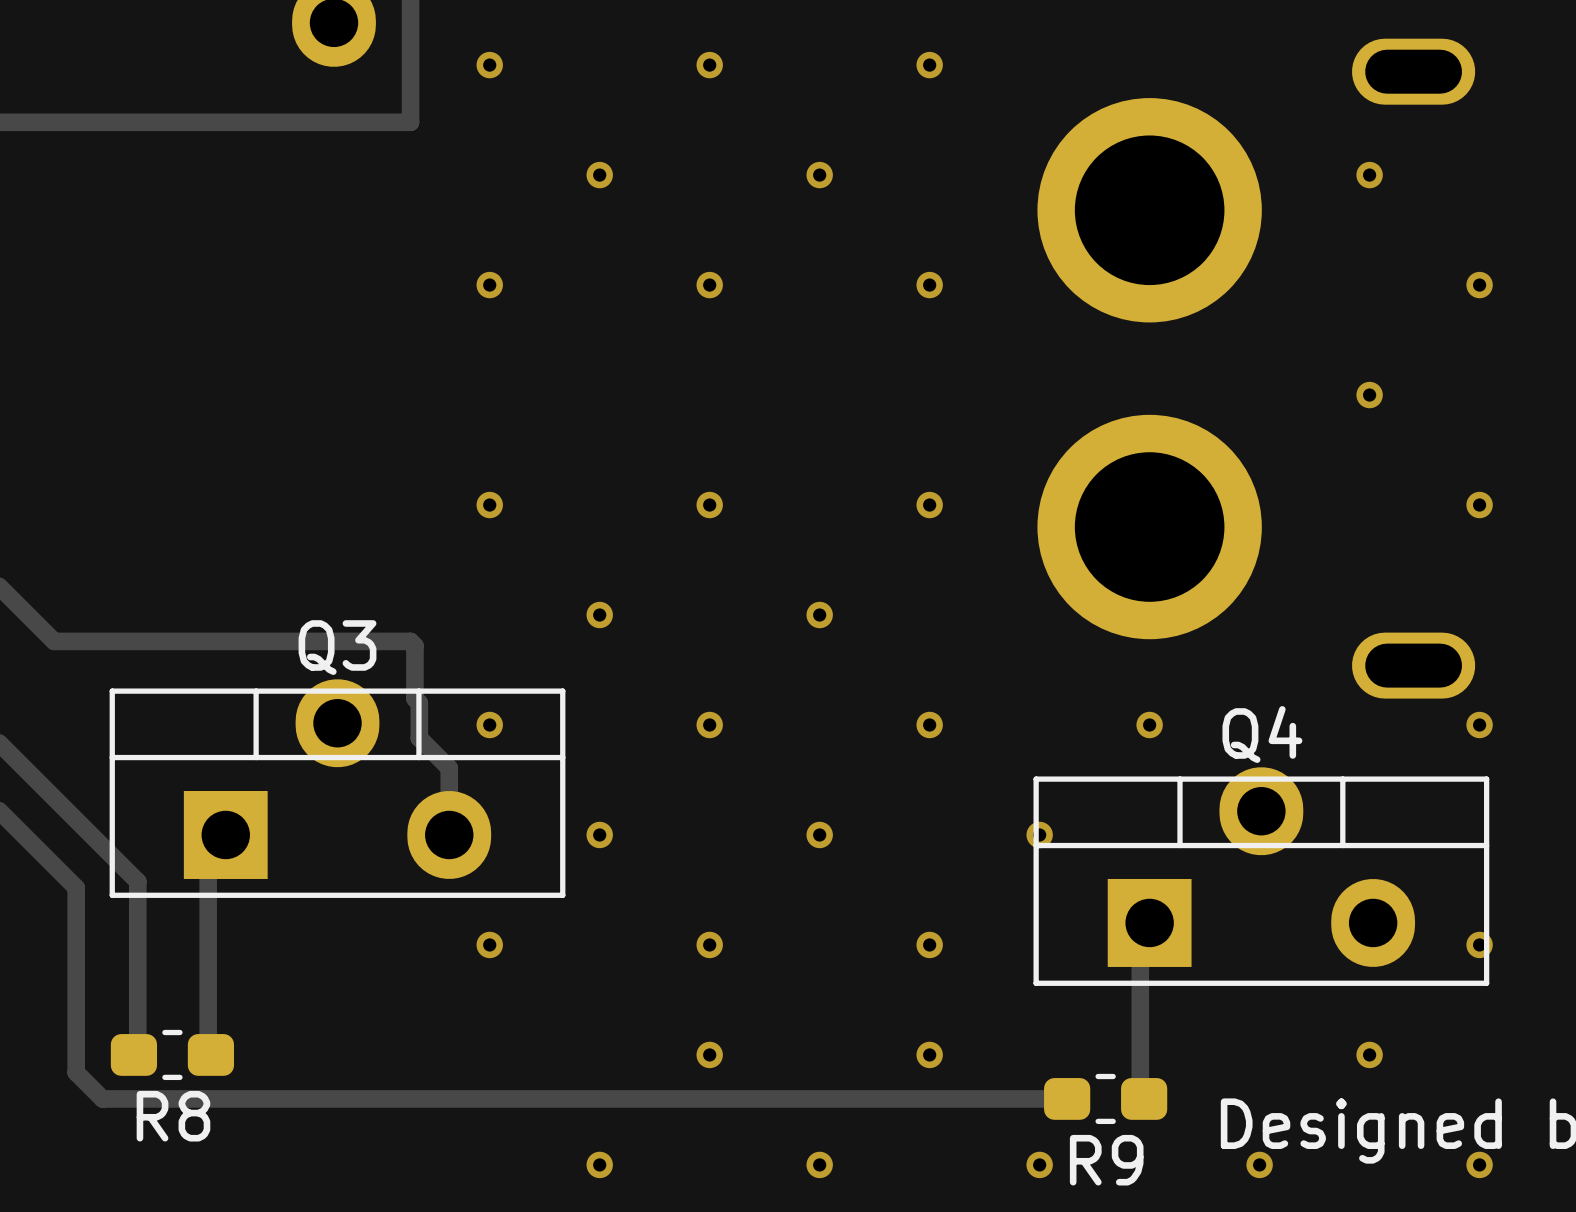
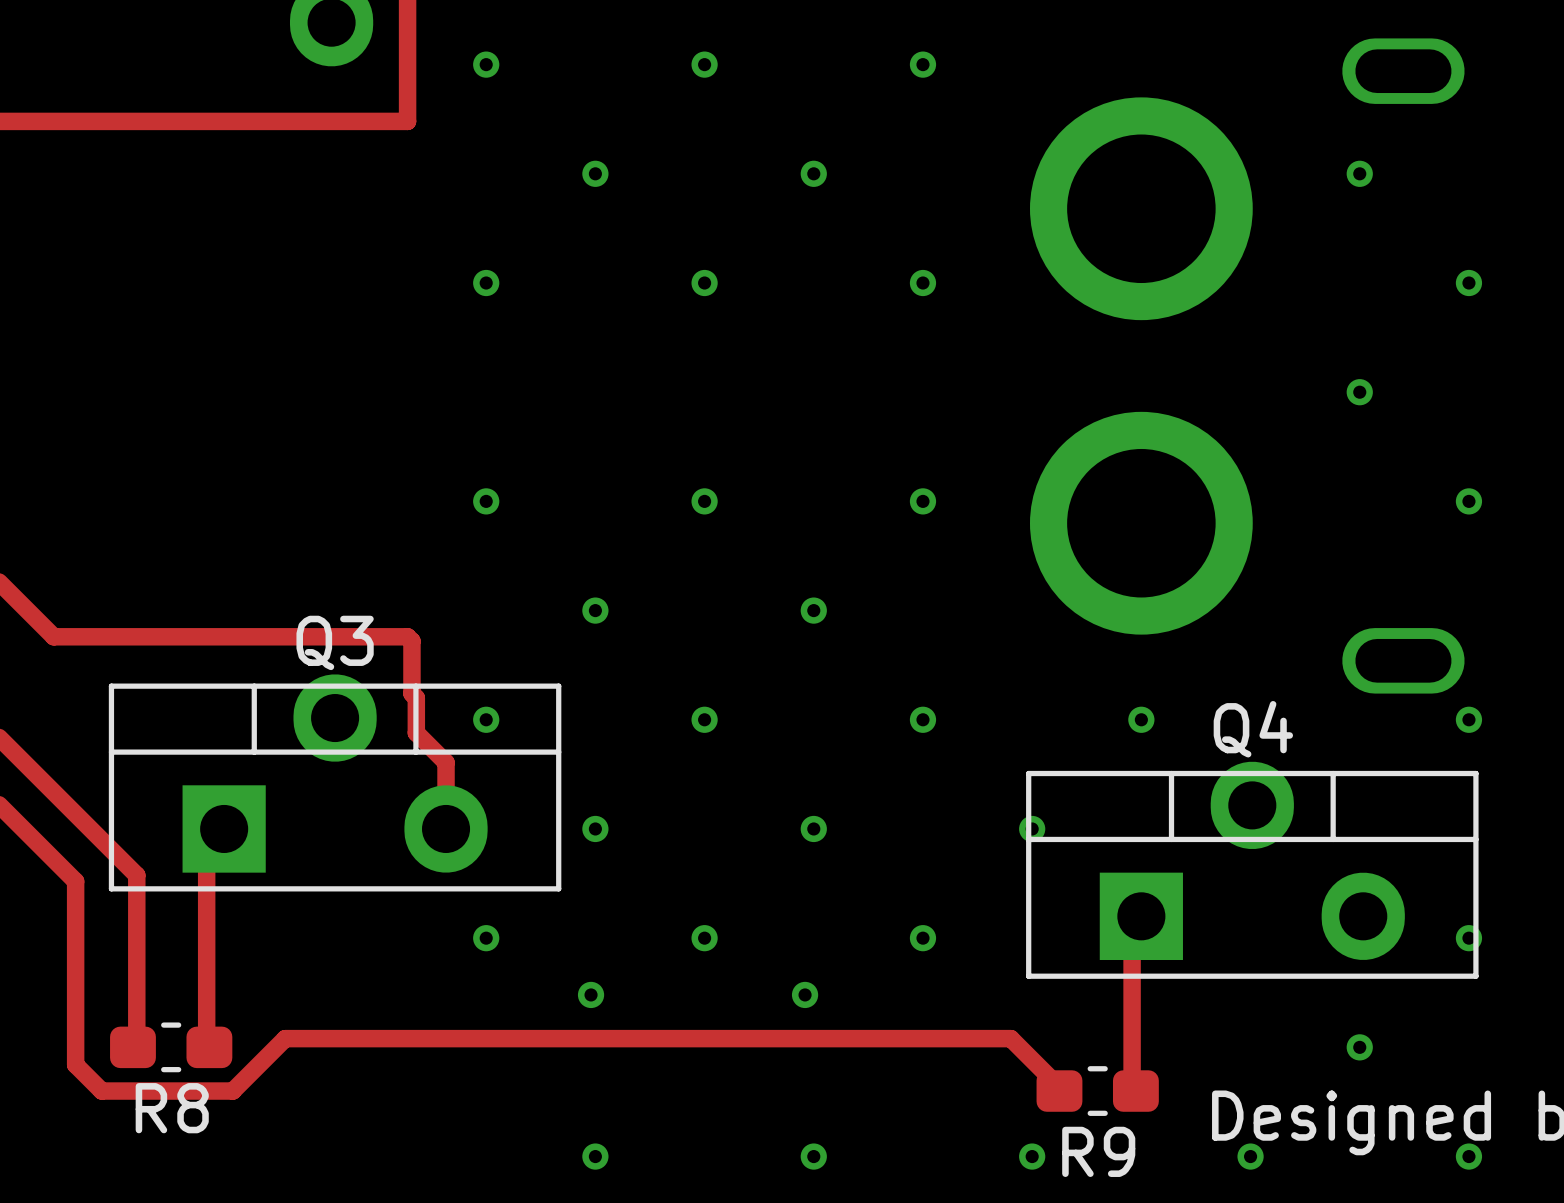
via: none -> (591, 994)
via: none -> (805, 994)
via: (709, 1054) -> none
via: (929, 1054) -> none
track: (234, 1098) (1071, 1098) -> (232, 1091) (285, 1038) (1010, 1038) (1063, 1091)

